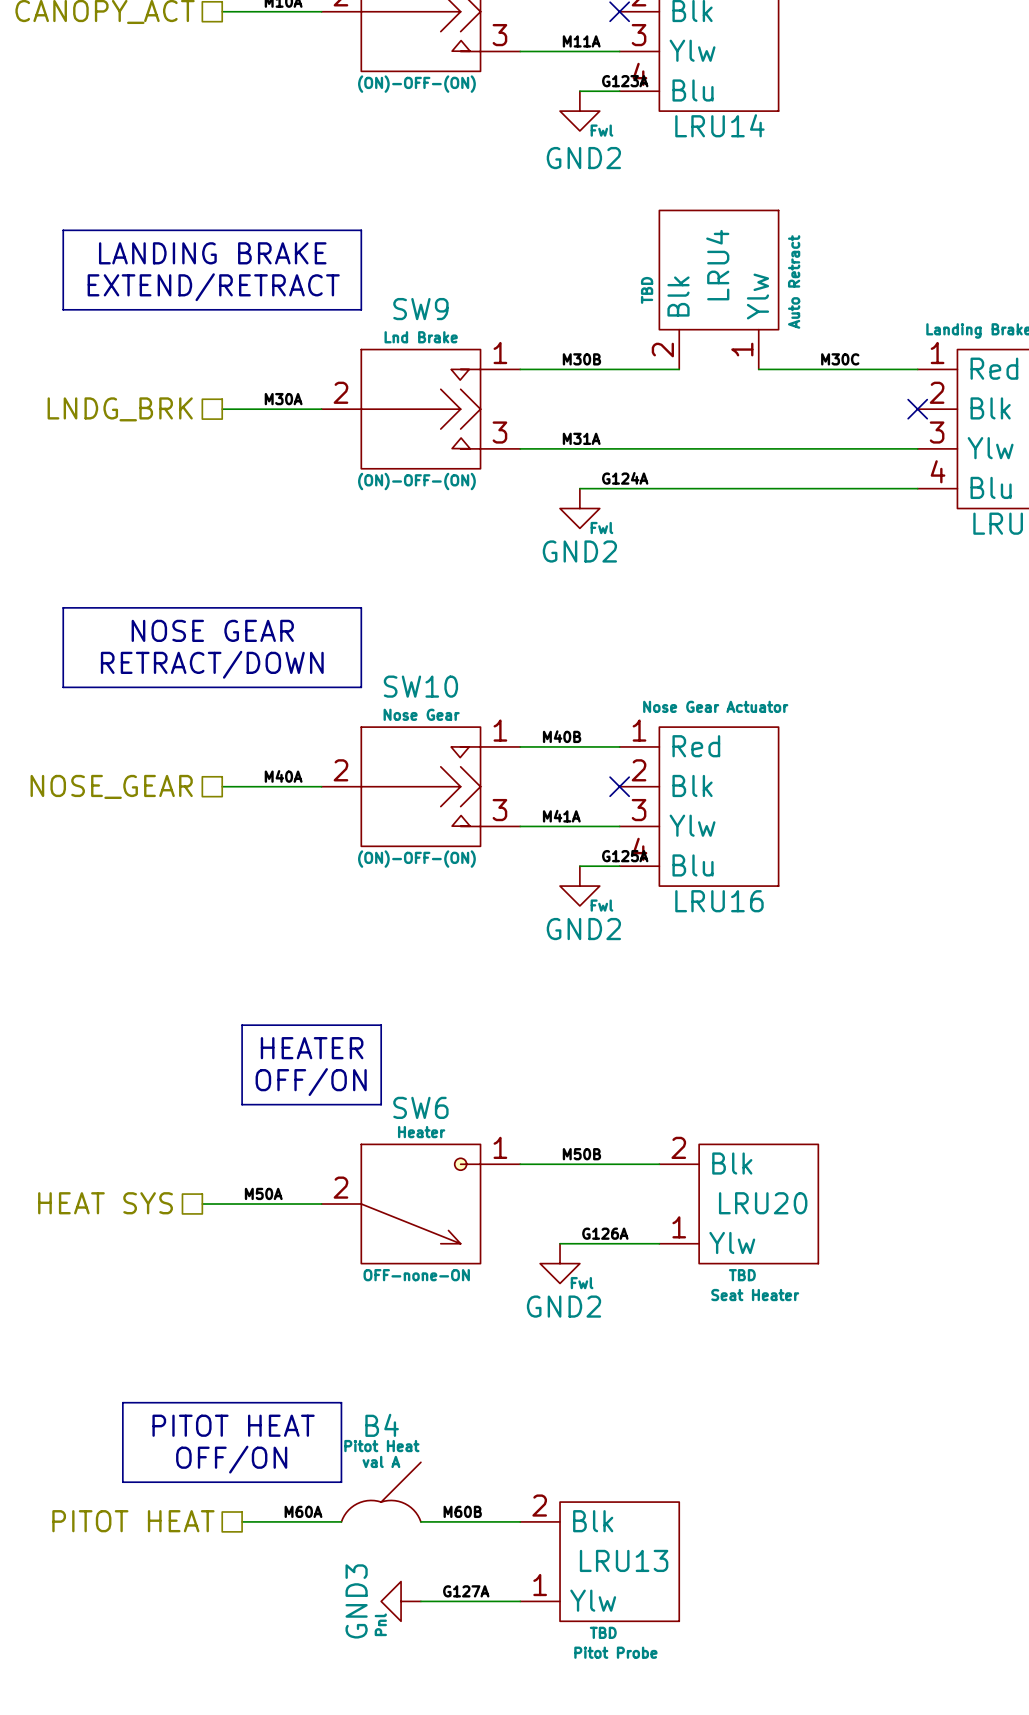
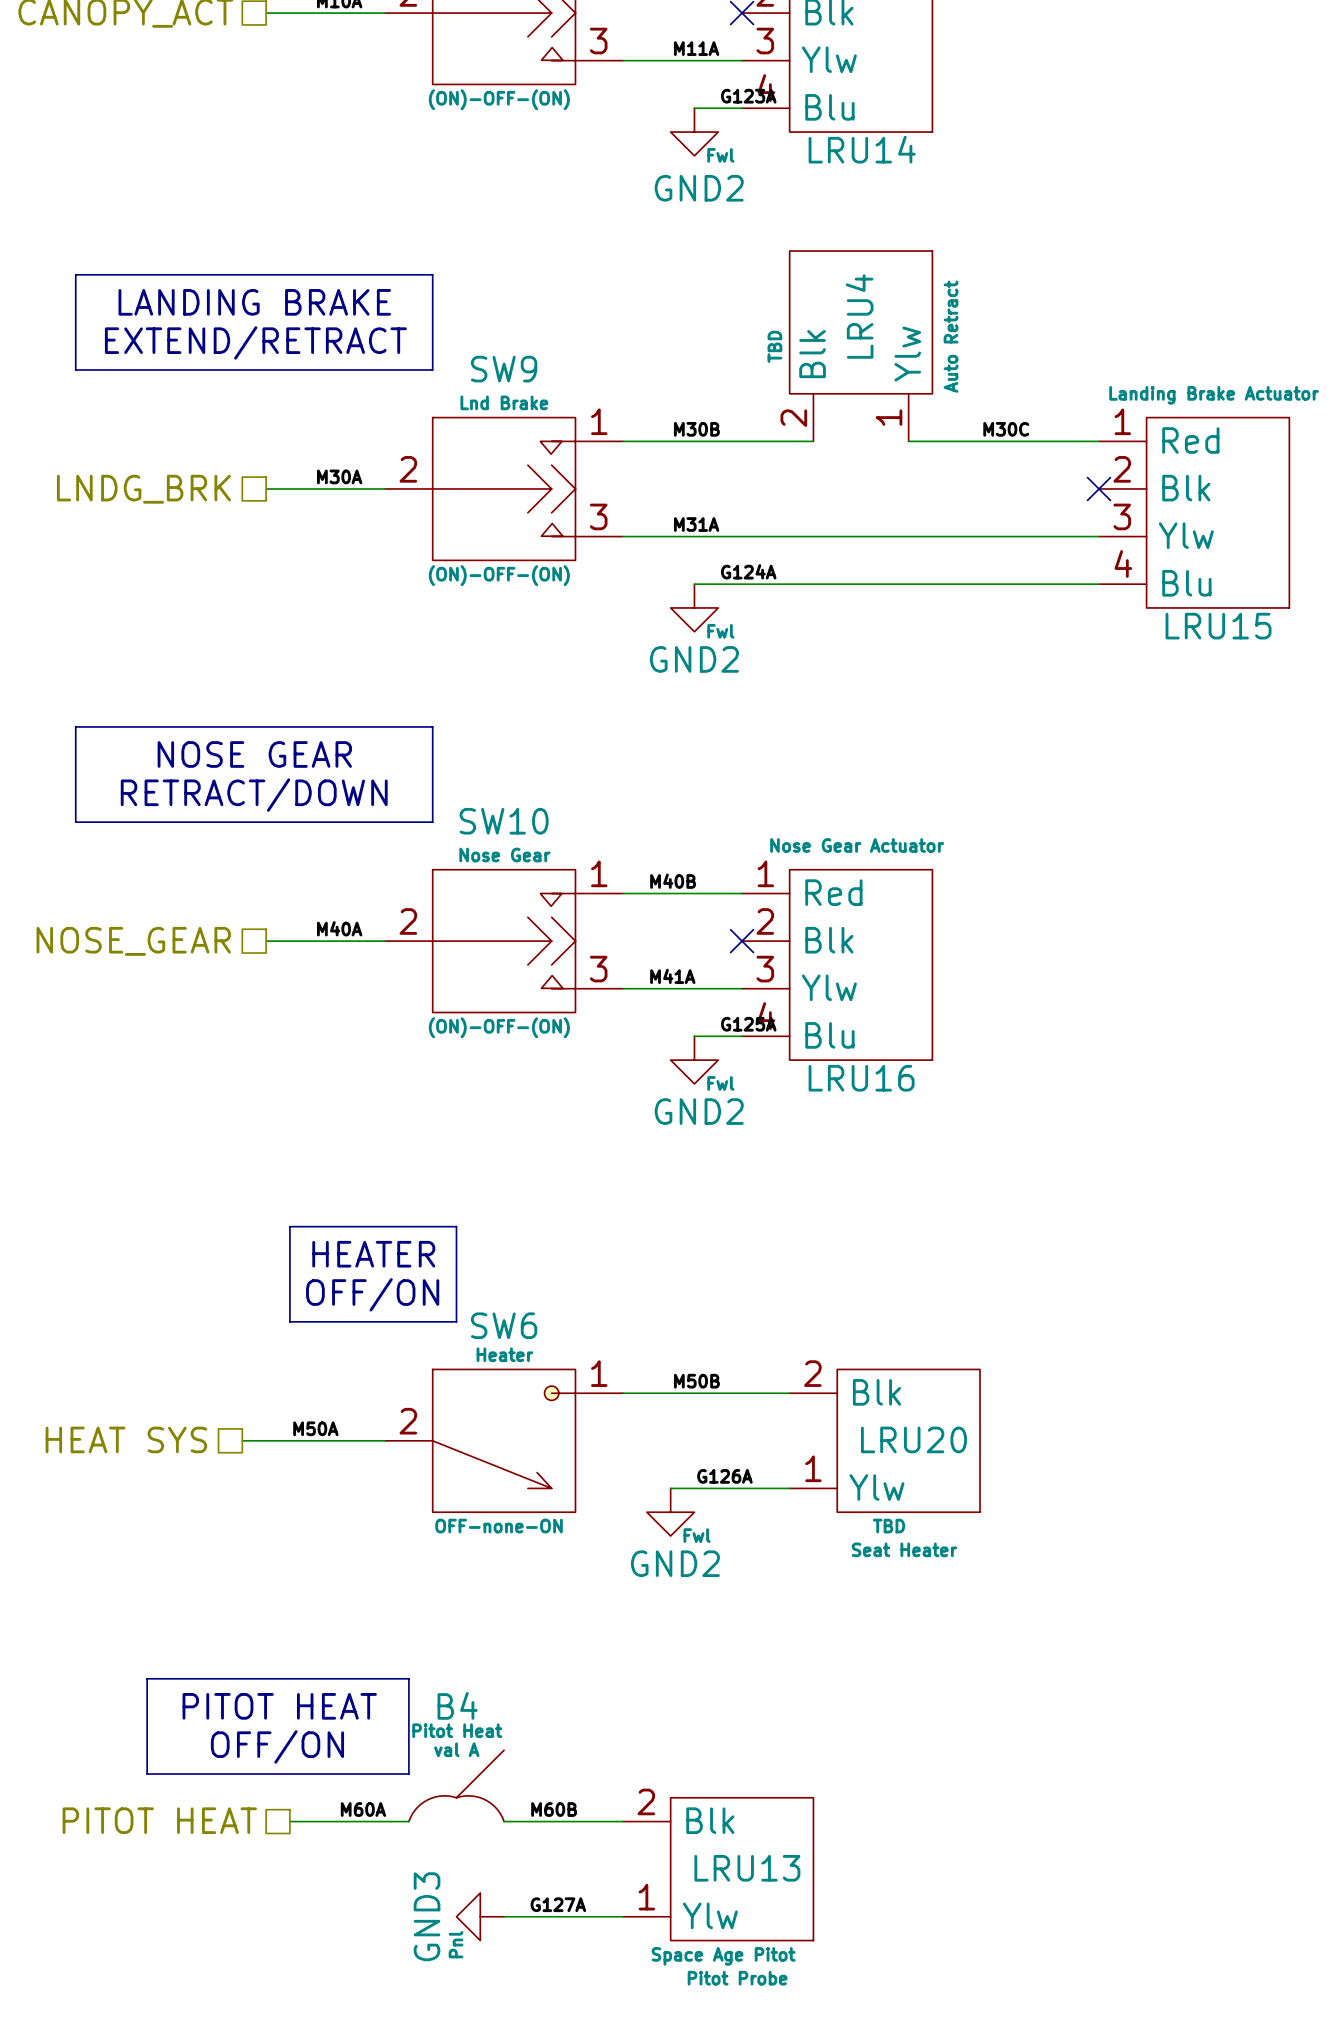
LRU13 text: TBD (603, 1632) -> Space Age Pitot (723, 1956)

